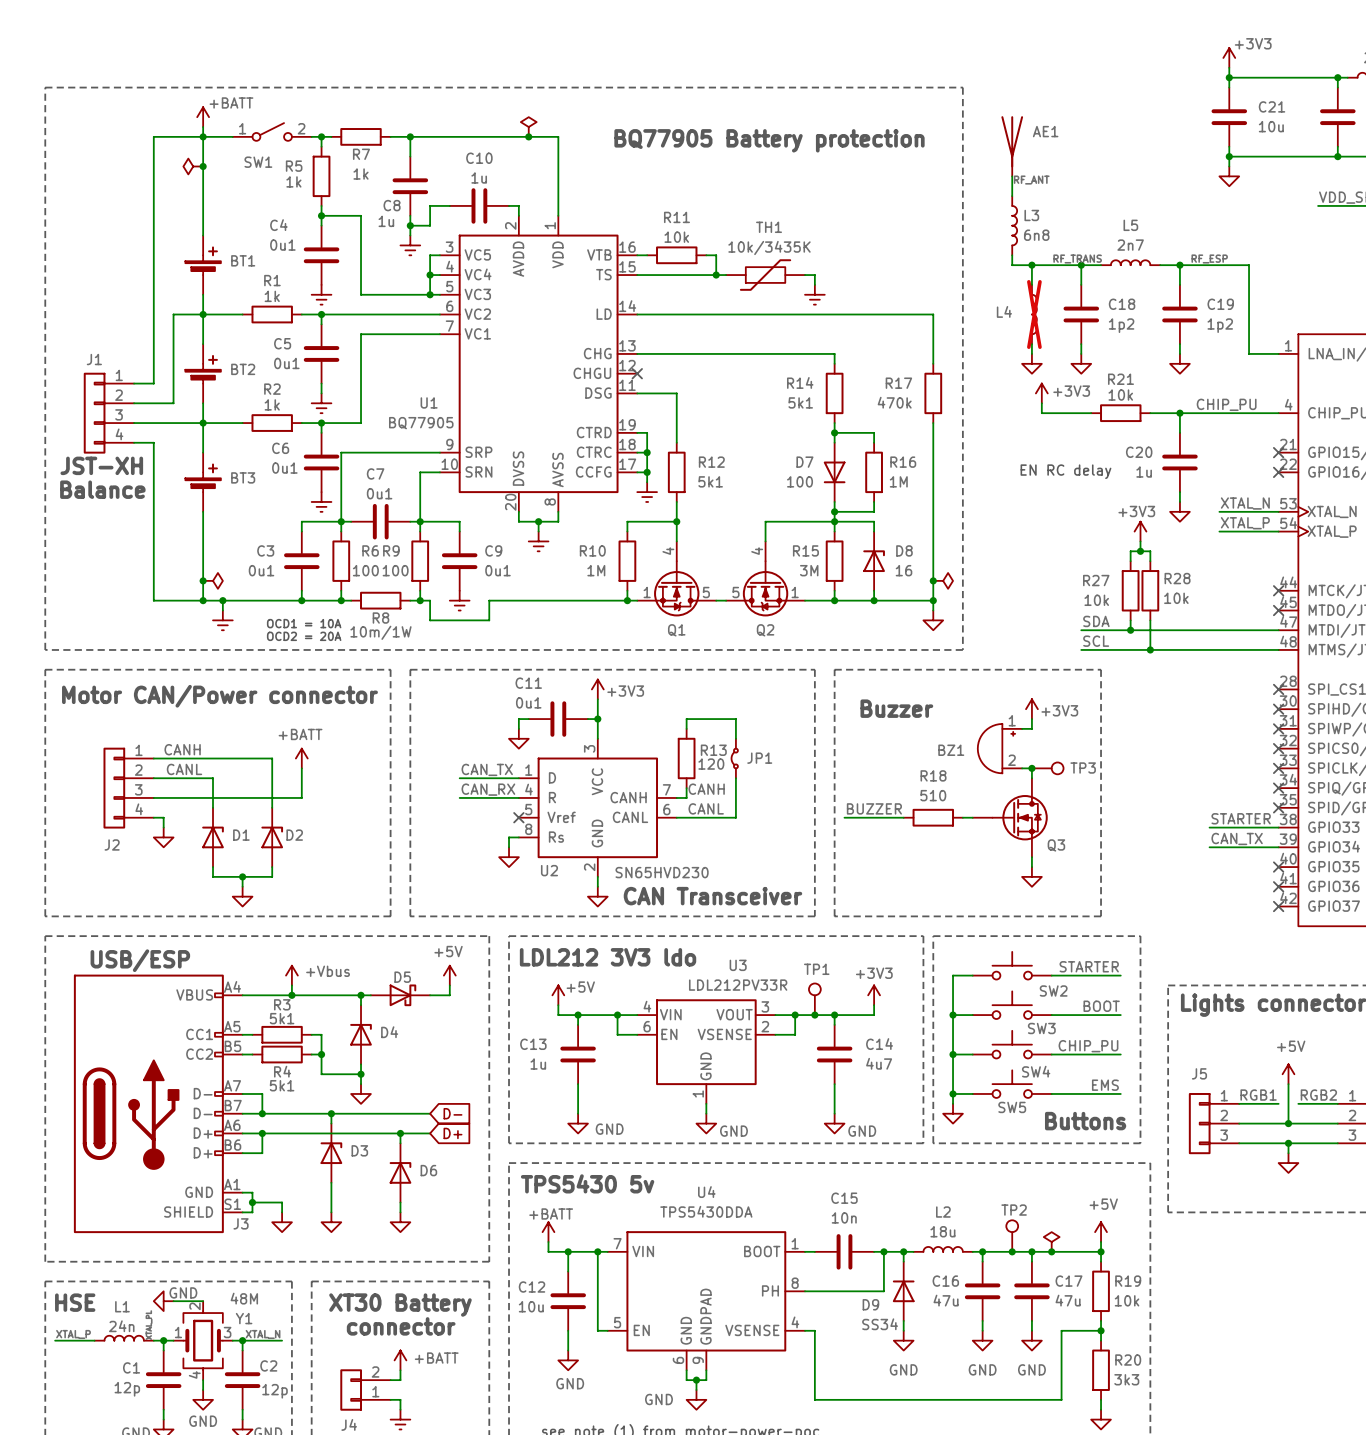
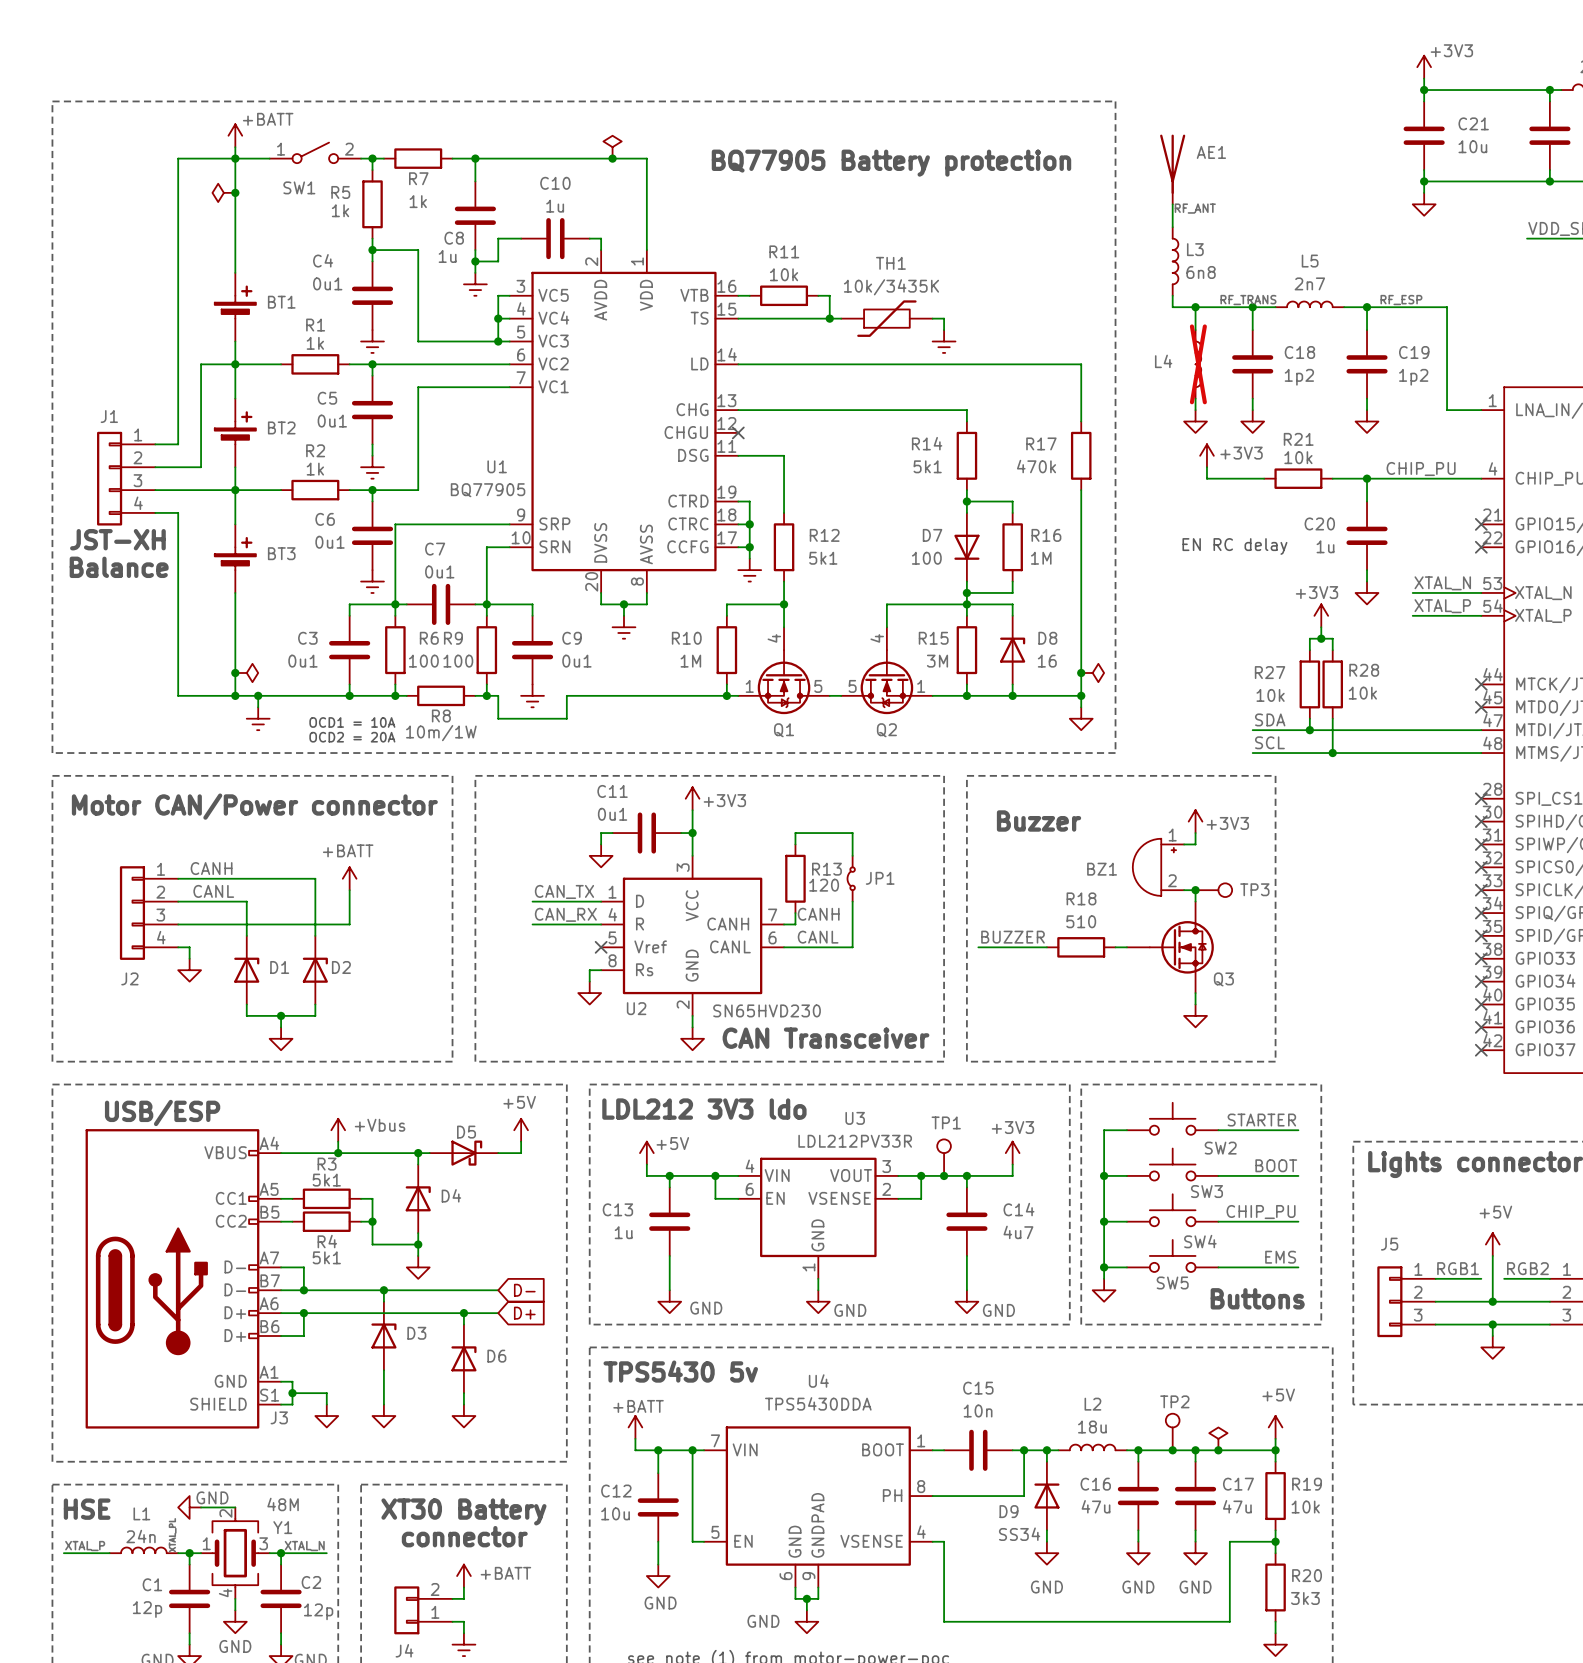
label: STARTER (1241, 818) -> none
wire: (1209, 827) (1278, 827) -> none
no-connect mark: none -> (1481, 958)
label: CAN_TX (1237, 838) -> none
wire: (1209, 847) (1278, 847) -> none
no-connect mark: none -> (1481, 981)

